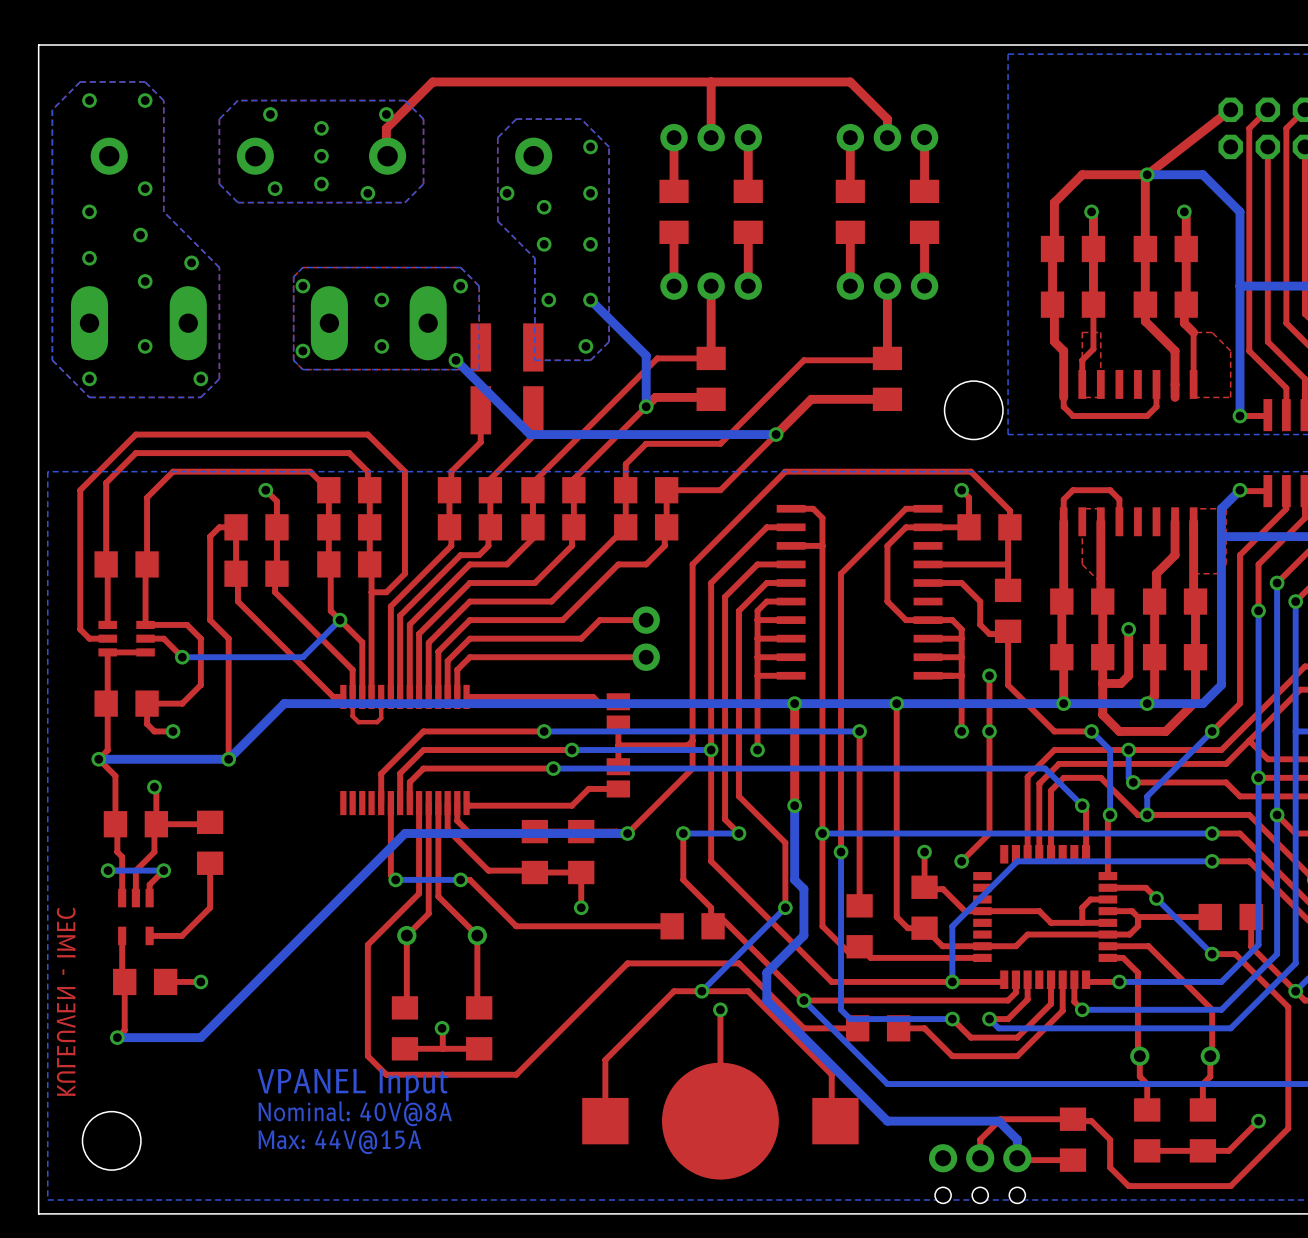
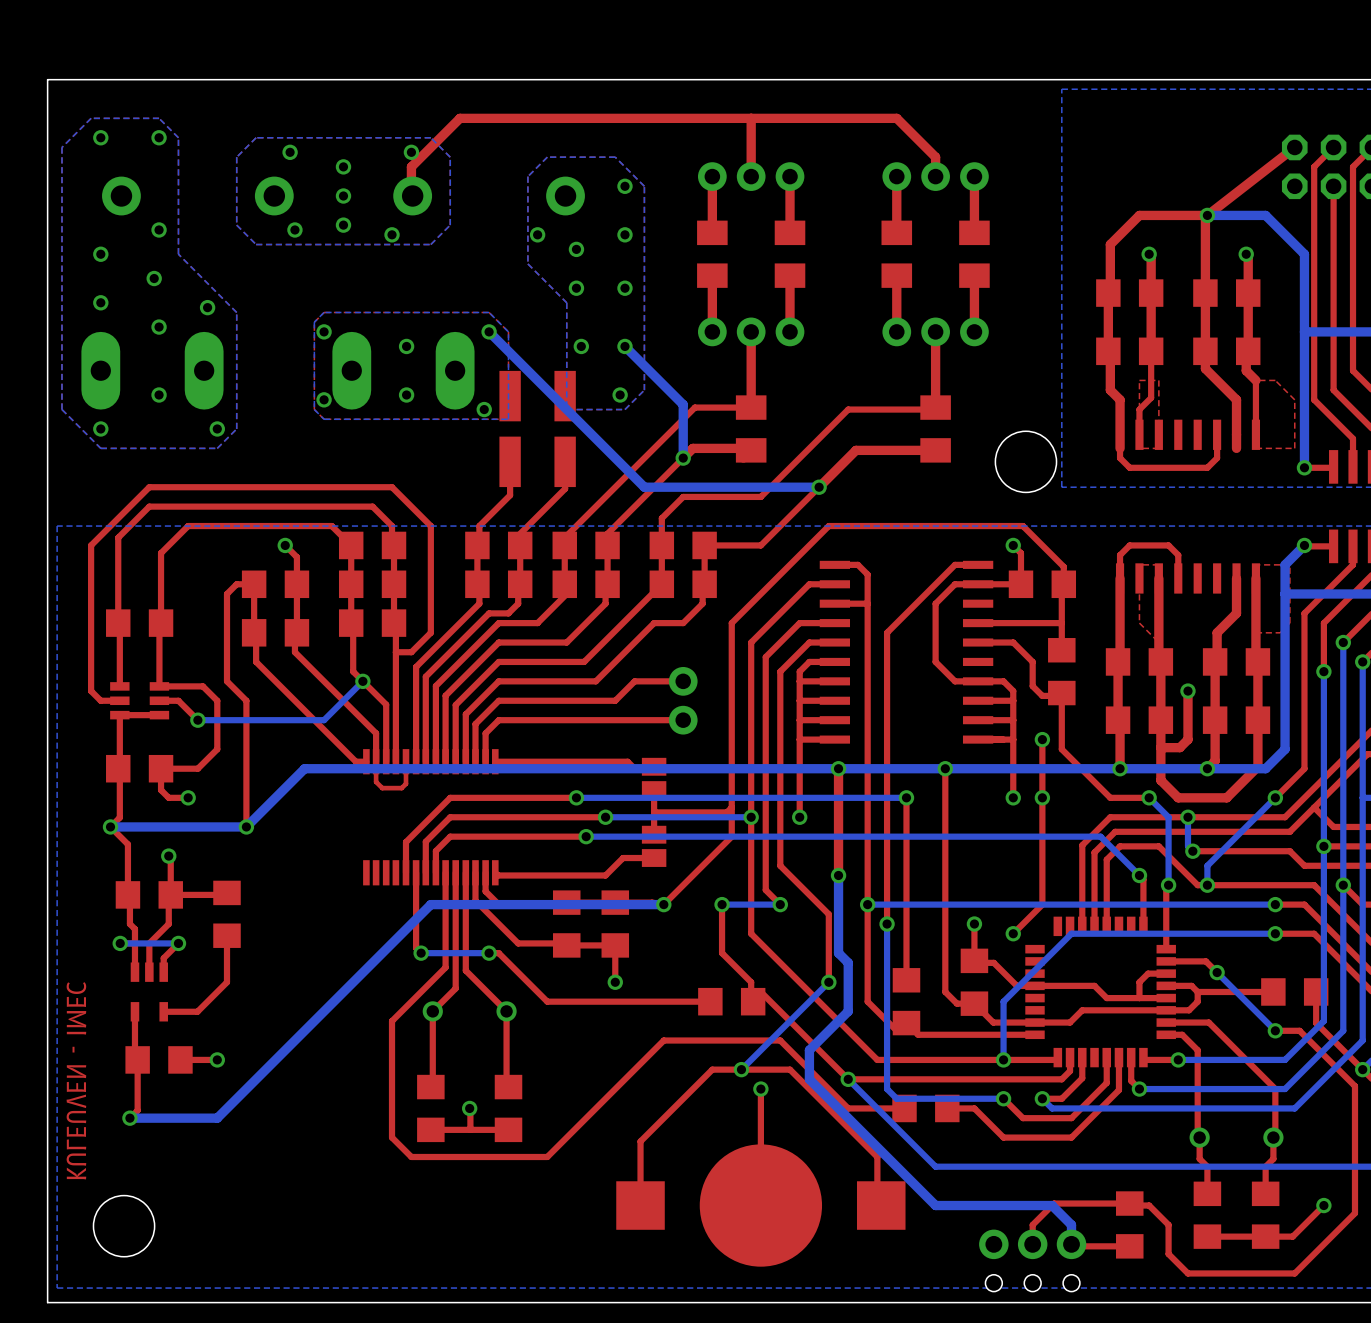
bottom track: (455, 360) (530, 434) (609, 434) -> (489, 331) (644, 487)
text: VPANEL Input (352, 1085) -> none
text: Nominal: 40V@8A (355, 1113) -> none
text: Max: 44V@15A (339, 1142) -> none

